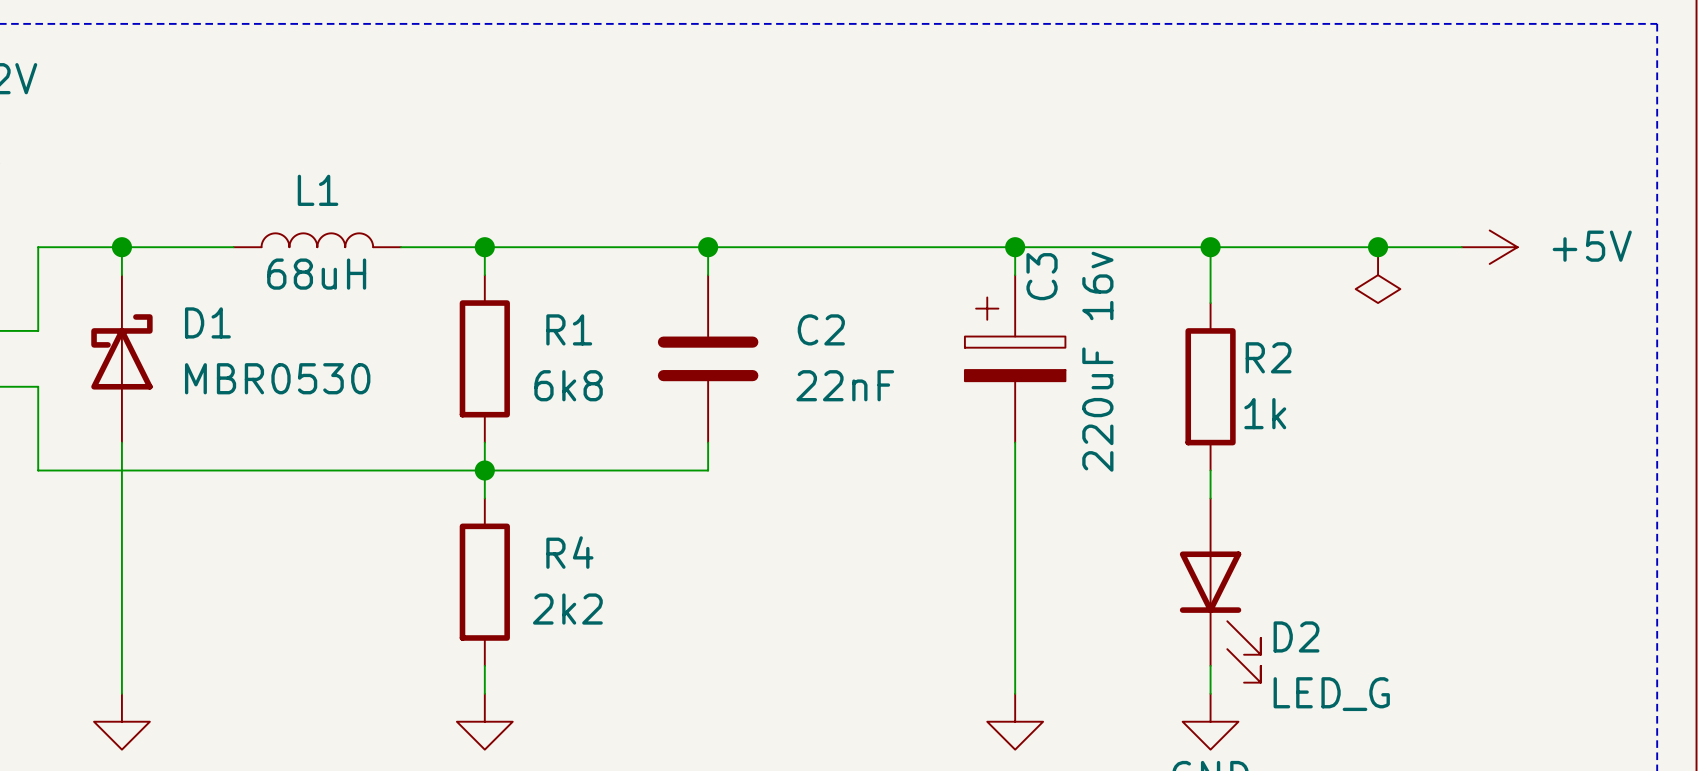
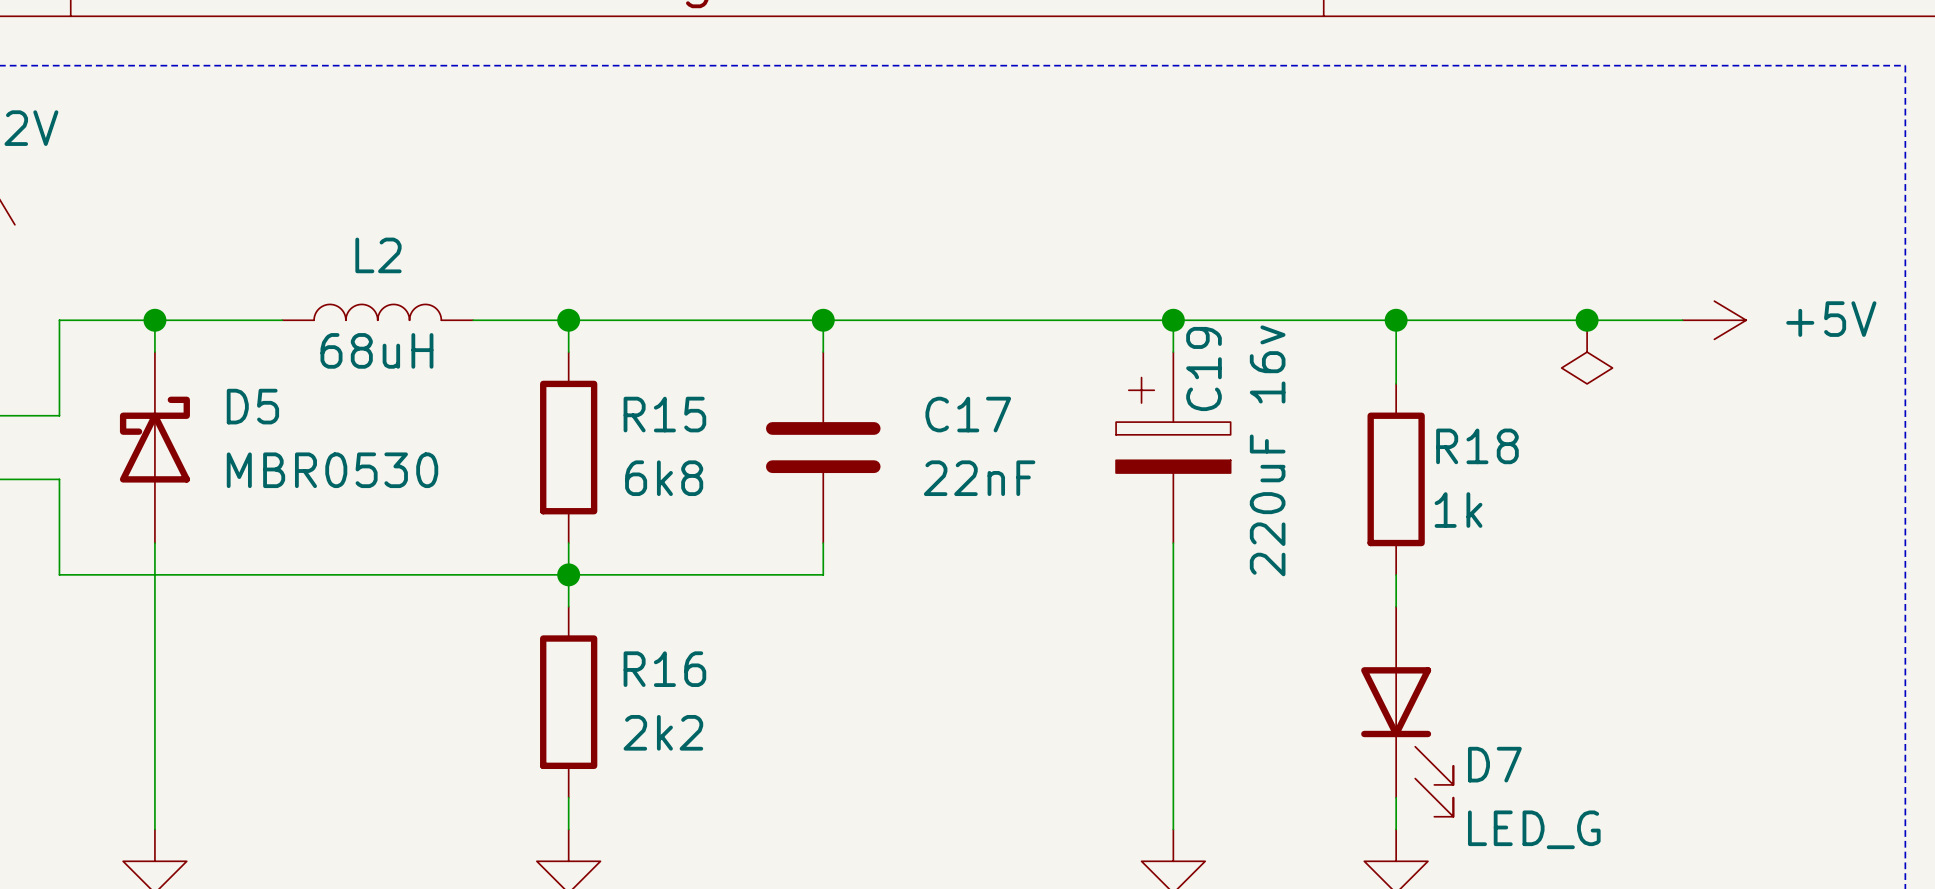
L1 name: L1 (318, 190) -> L2 (378, 255)
C3 name: C3 (1042, 276) -> C19 (1204, 369)
D1 name: D1 (207, 322) -> D5 (252, 406)
R1 name: R1 (569, 329) -> R15 (664, 414)
C2 name: C2 (821, 329) -> C17 (968, 414)
R2 name: R2 (1268, 357) -> R18 (1477, 446)
R4 name: R4 (569, 552) -> R16 (664, 669)
D2 name: D2 (1296, 636) -> D7 (1494, 764)

